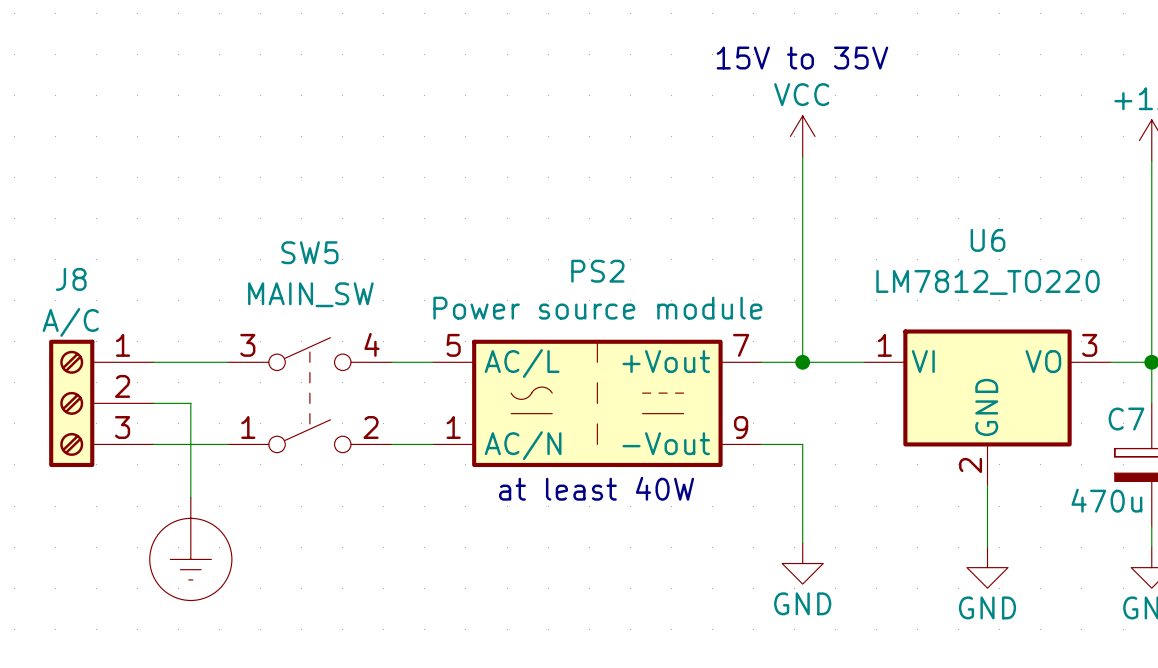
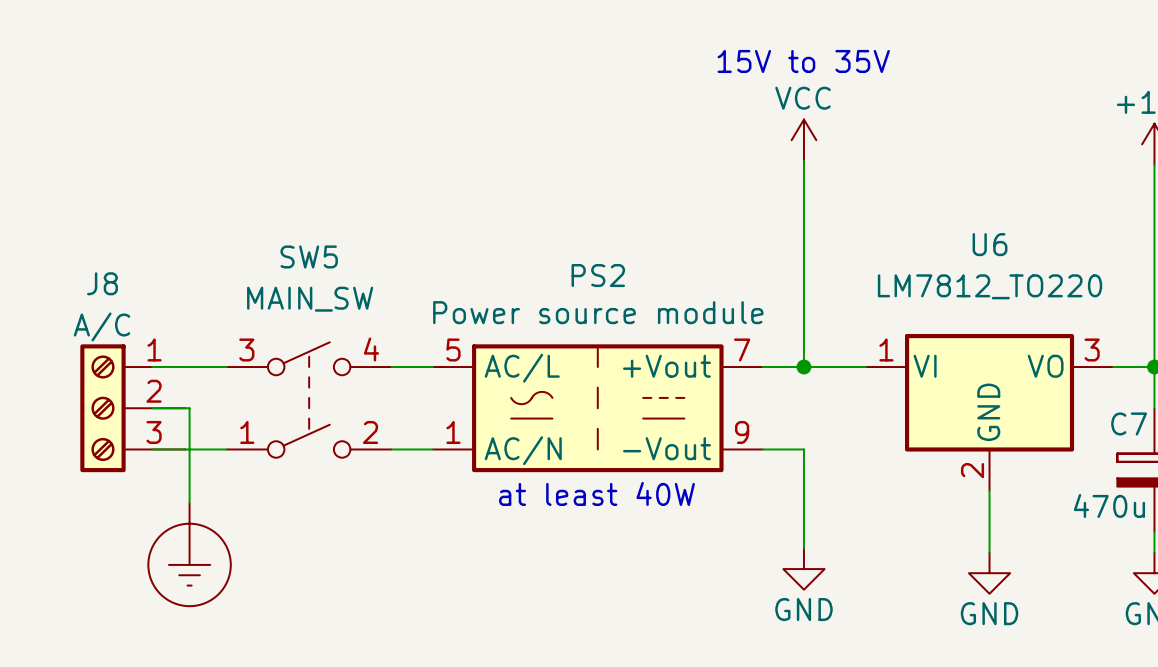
J8 position: (101, 403) -> (132, 408)

